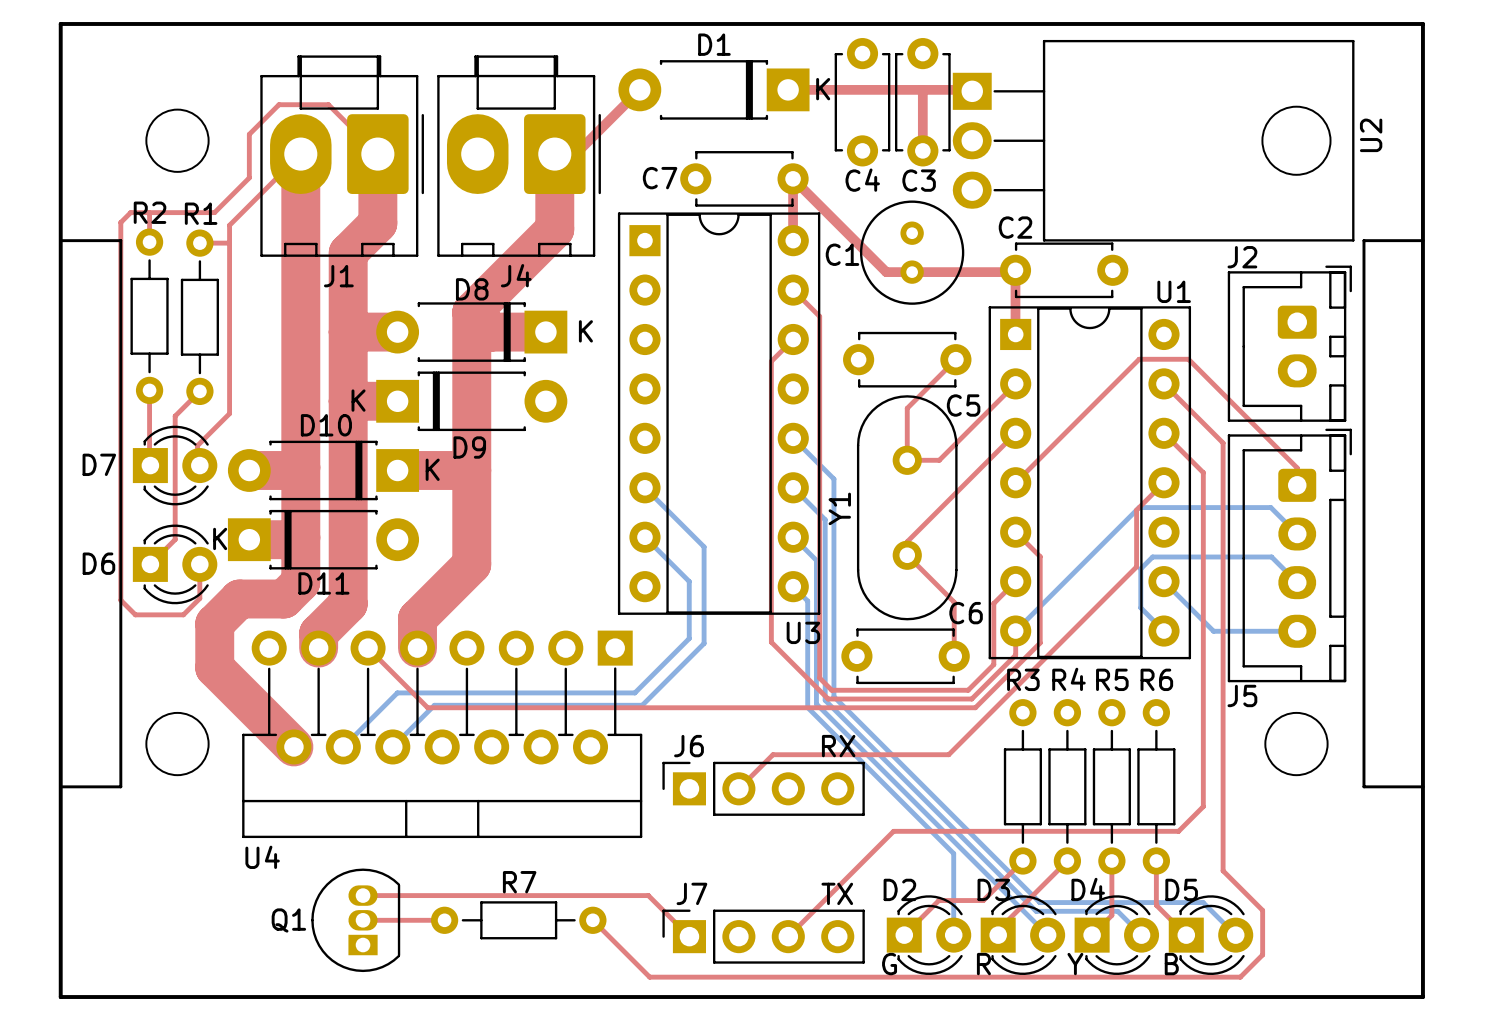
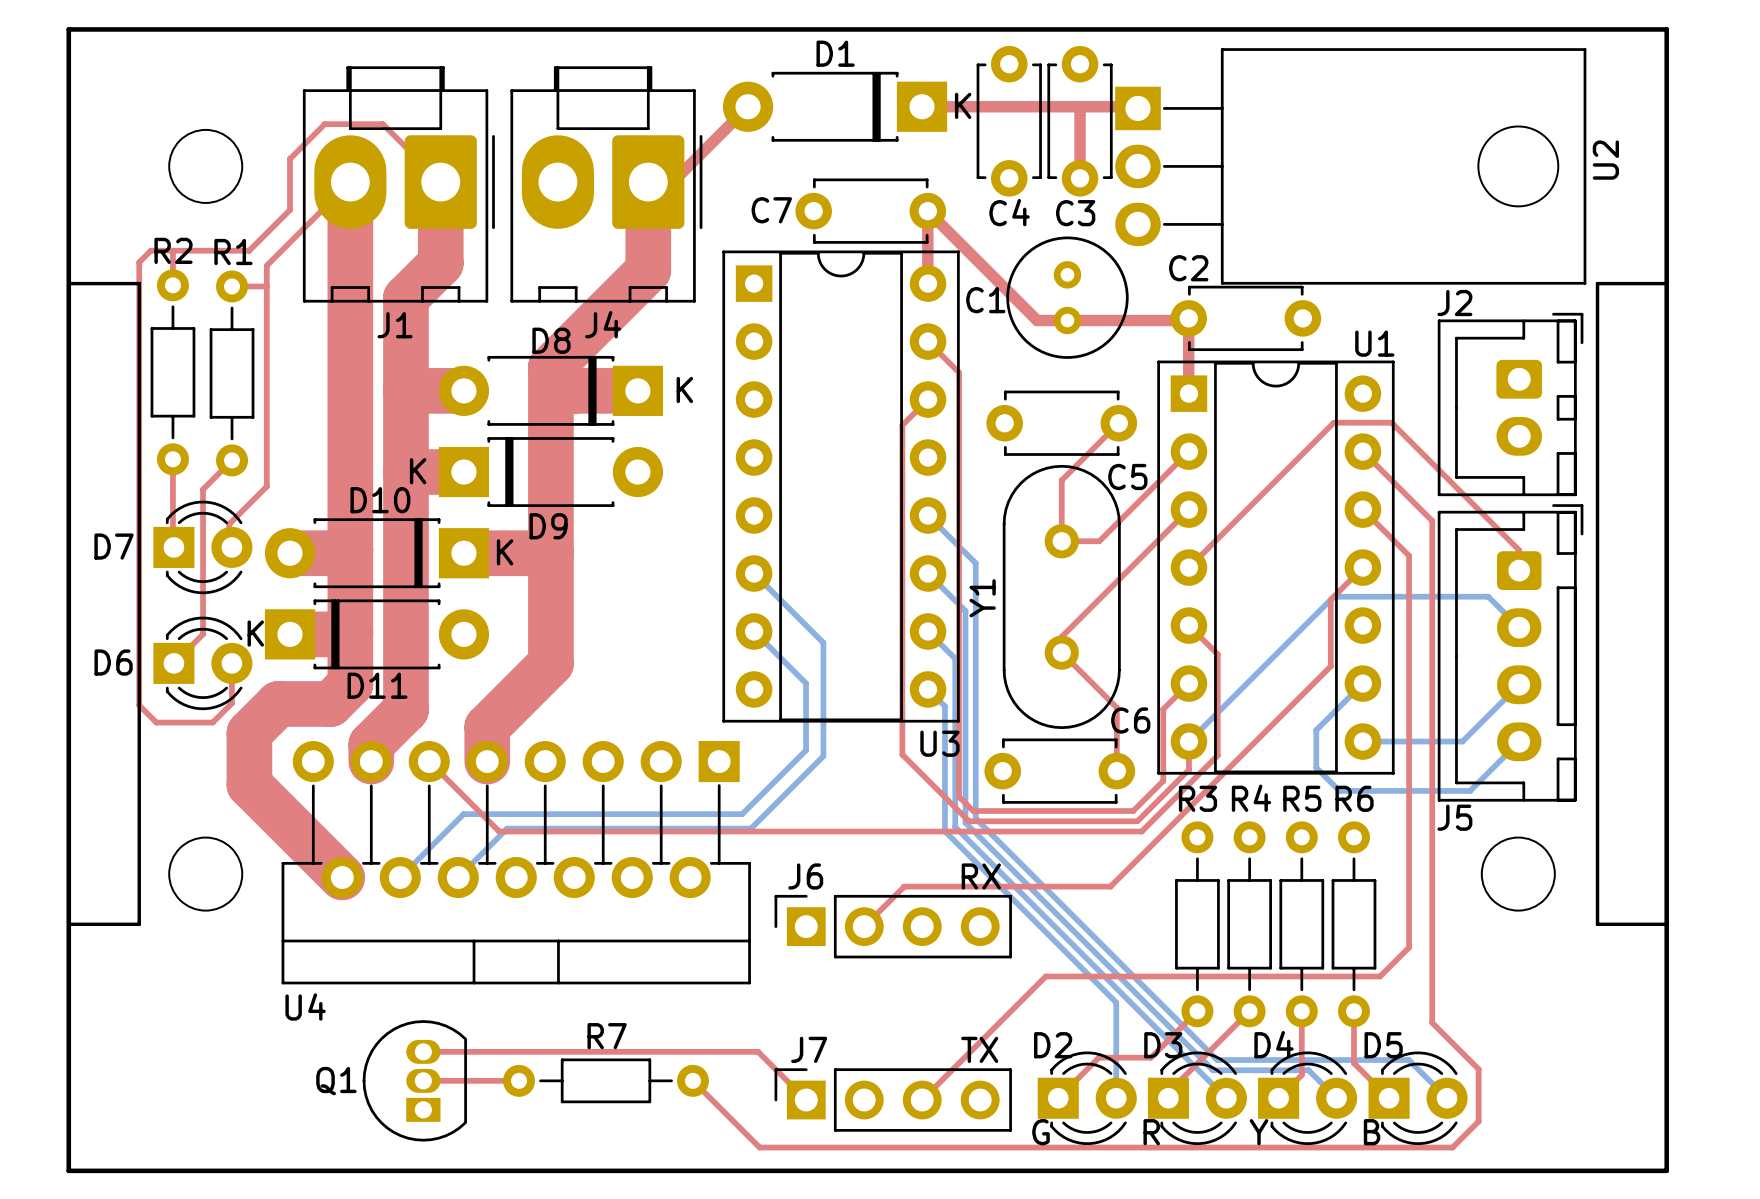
bottom track: (1163, 581) (1213, 631) (1297, 631) -> (1362, 683) (1316, 730) (1316, 767) (1339, 790) (1470, 790) (1519, 741)
bottom track: (1297, 582) (1271, 556) (1152, 556) (1140, 568) (1140, 607) (1163, 631) -> (1519, 684) (1462, 741) (1362, 741)

